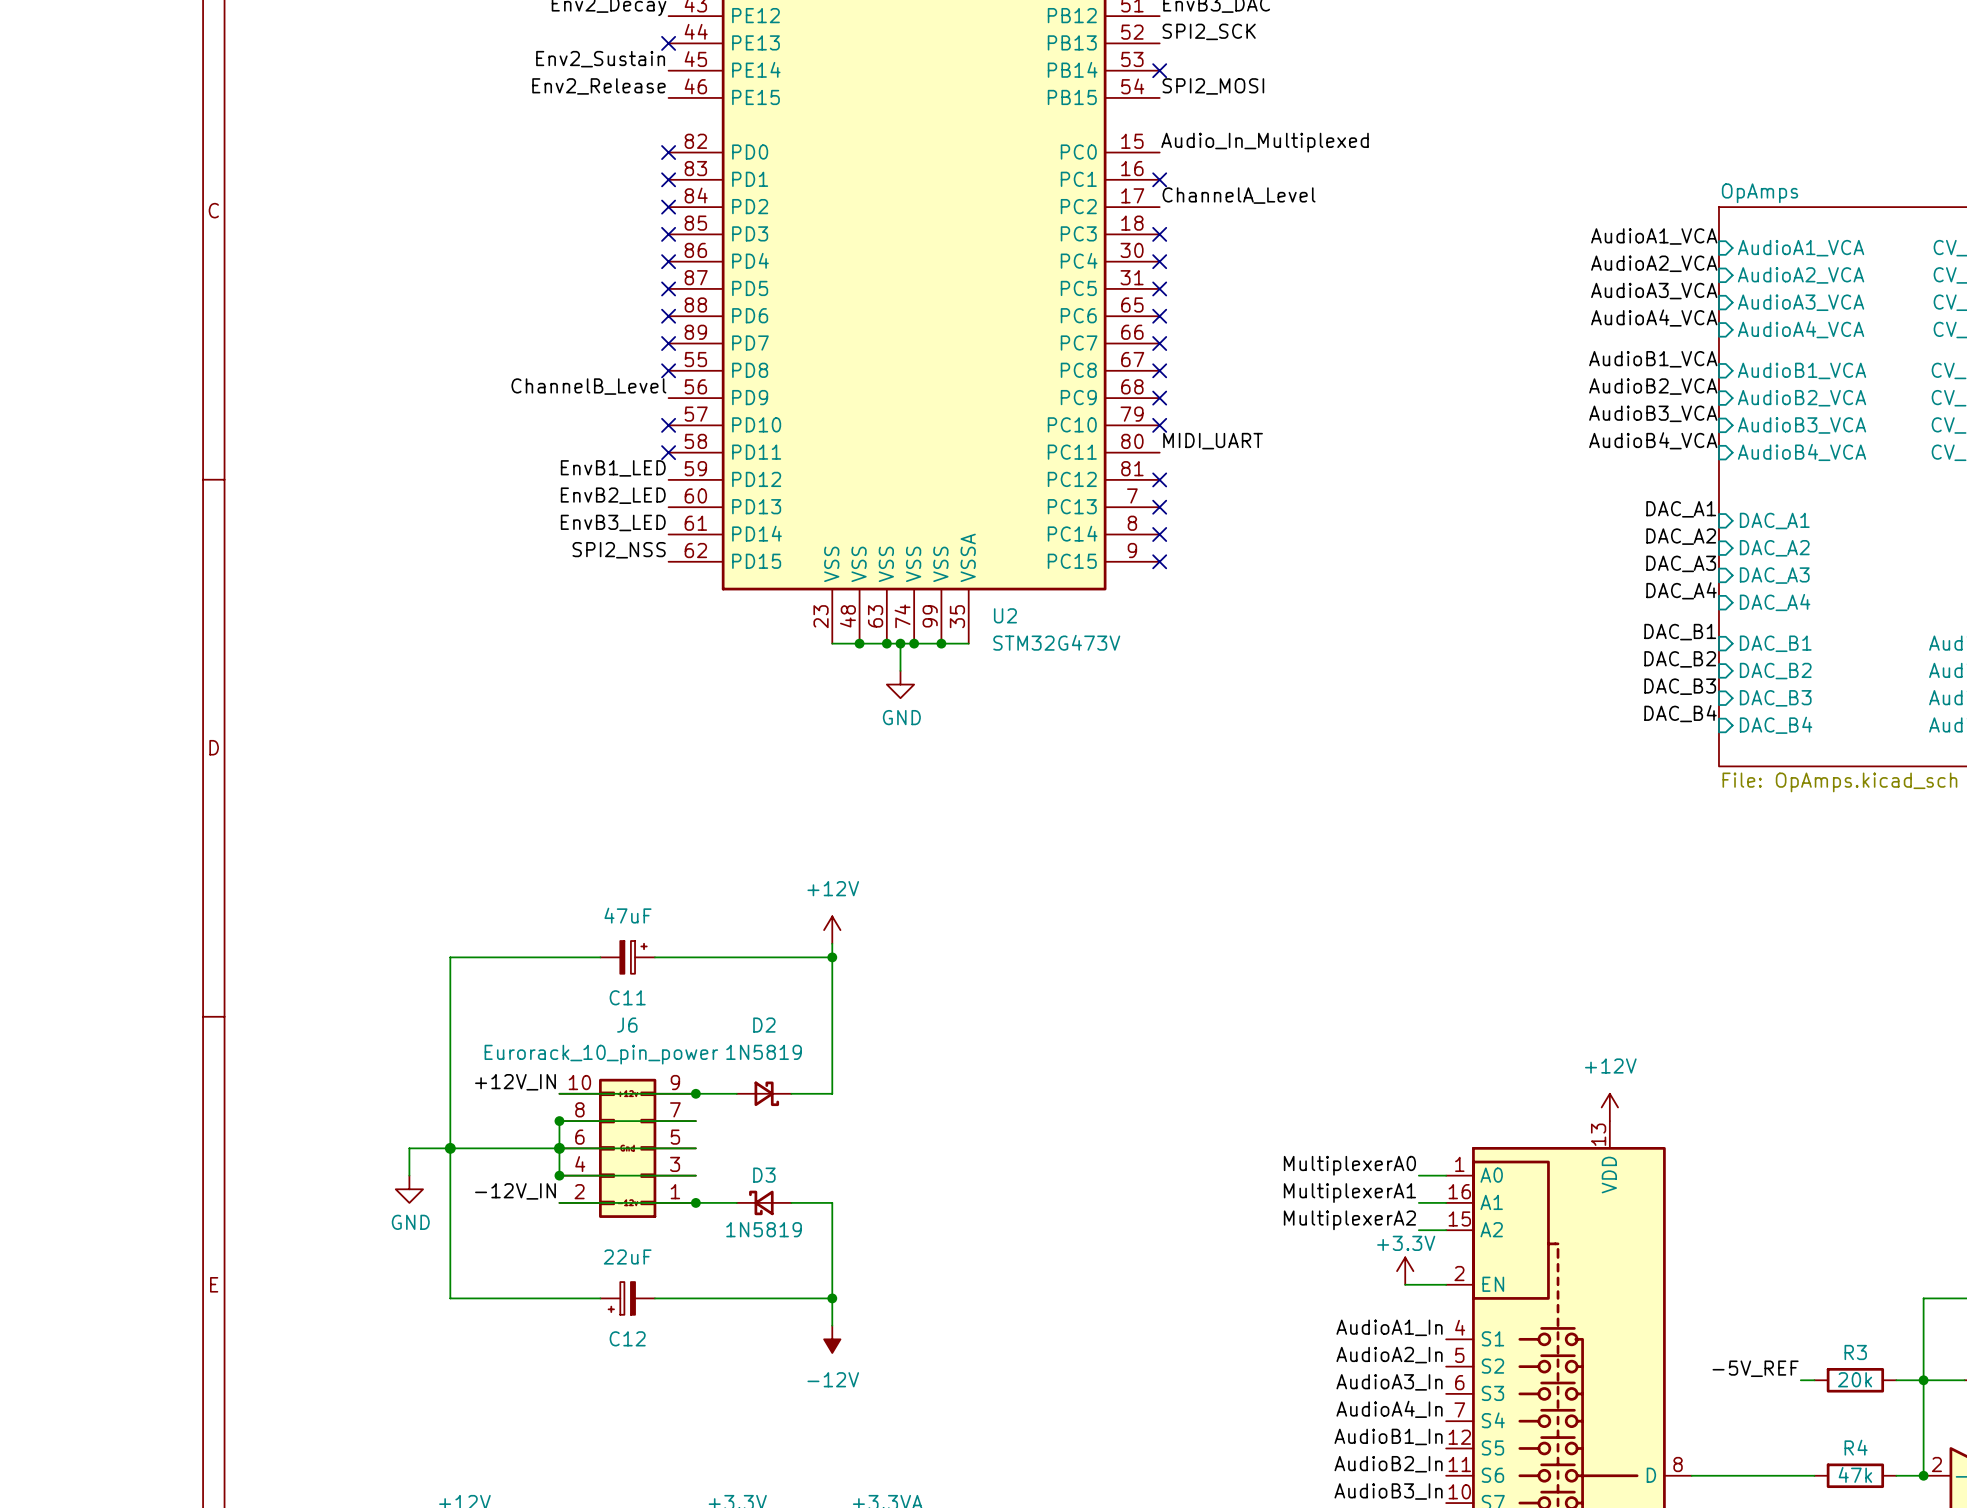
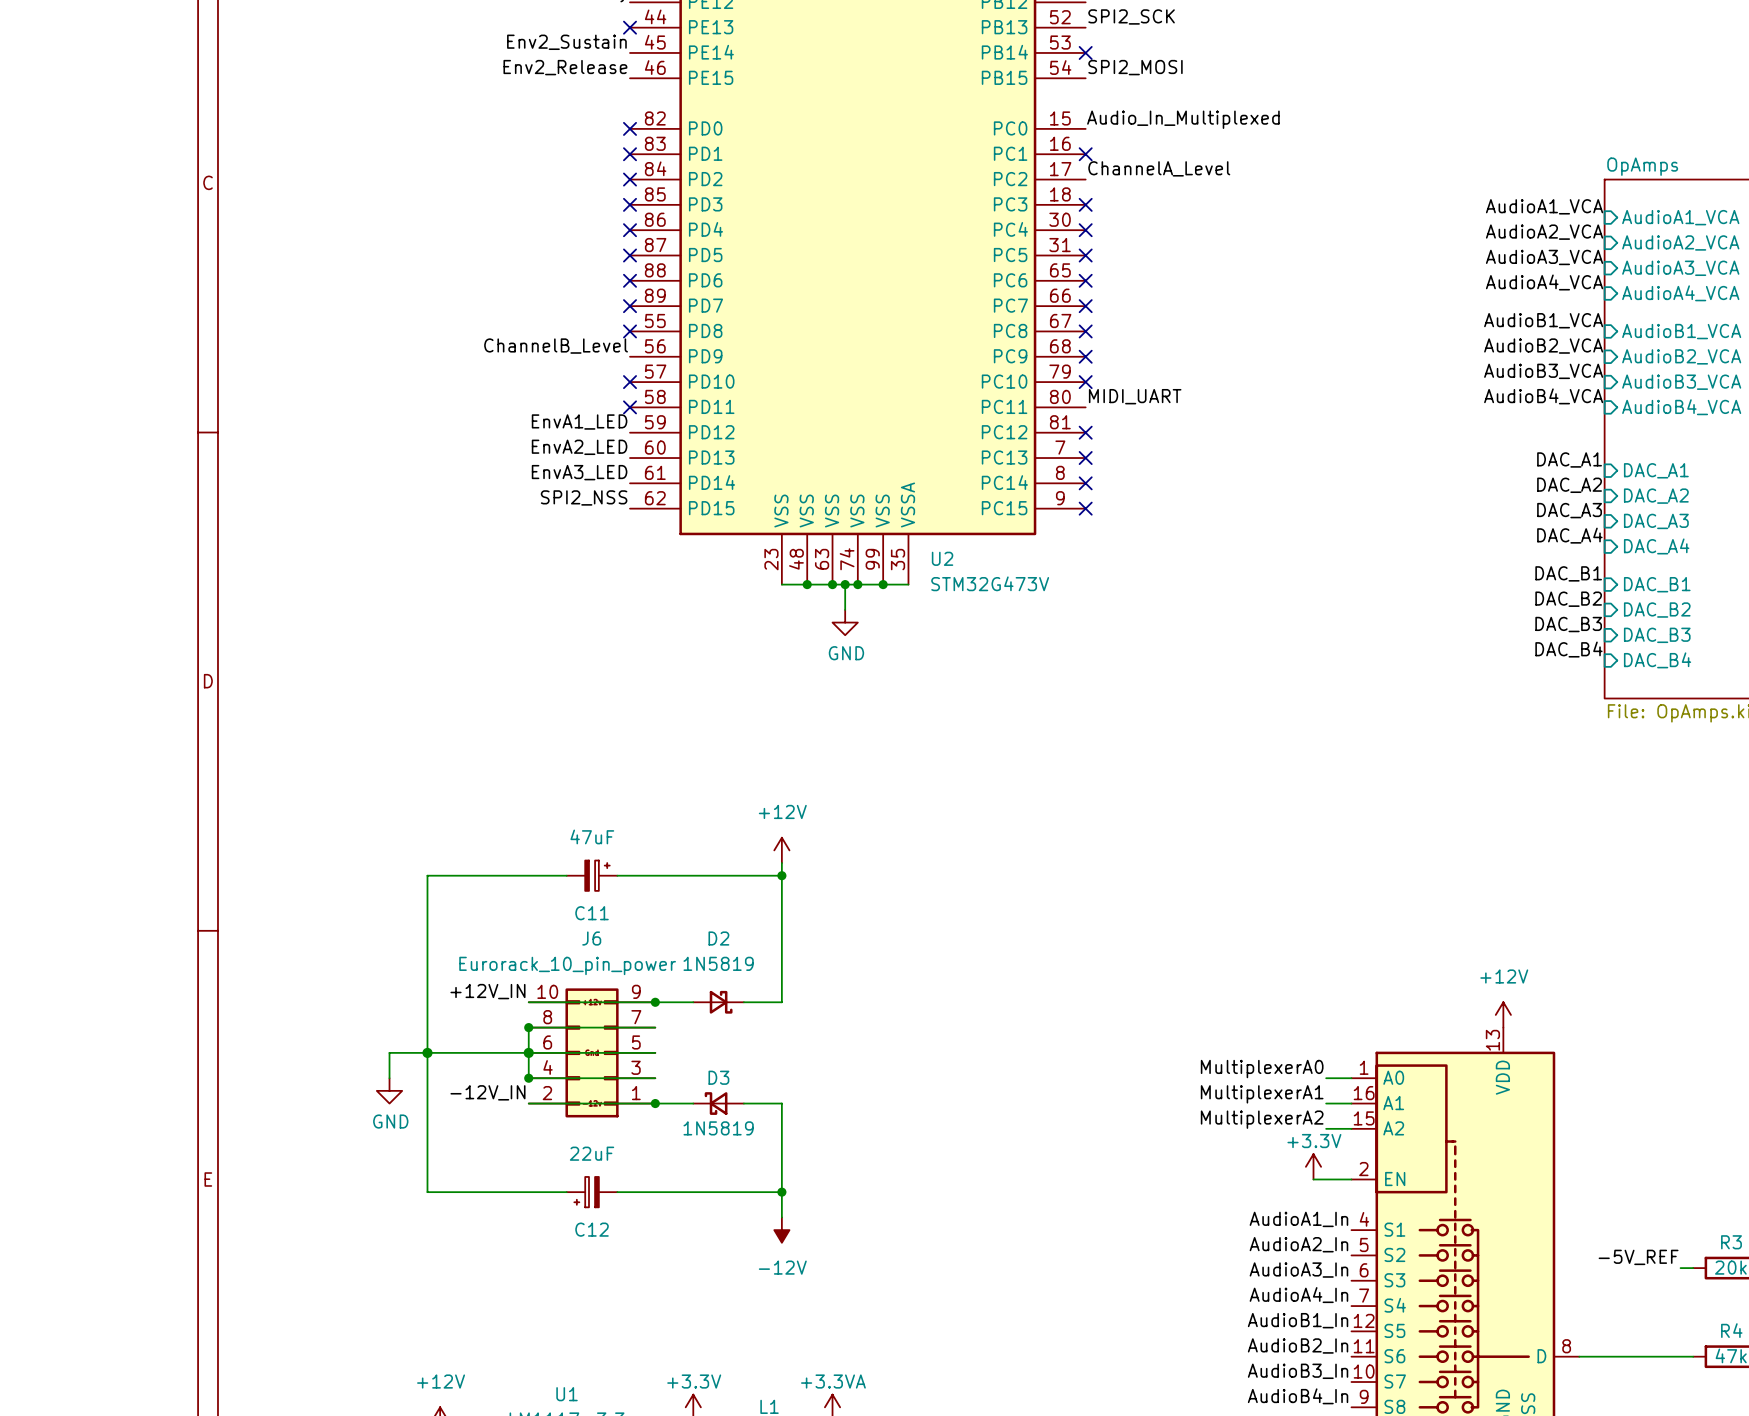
label: EnvB1_LED (613, 468) -> EnvA1_LED (579, 422)
label: EnvB2_LED (613, 495) -> EnvA2_LED (579, 447)
label: EnvB3_LED (613, 522) -> EnvA3_LED (579, 472)

